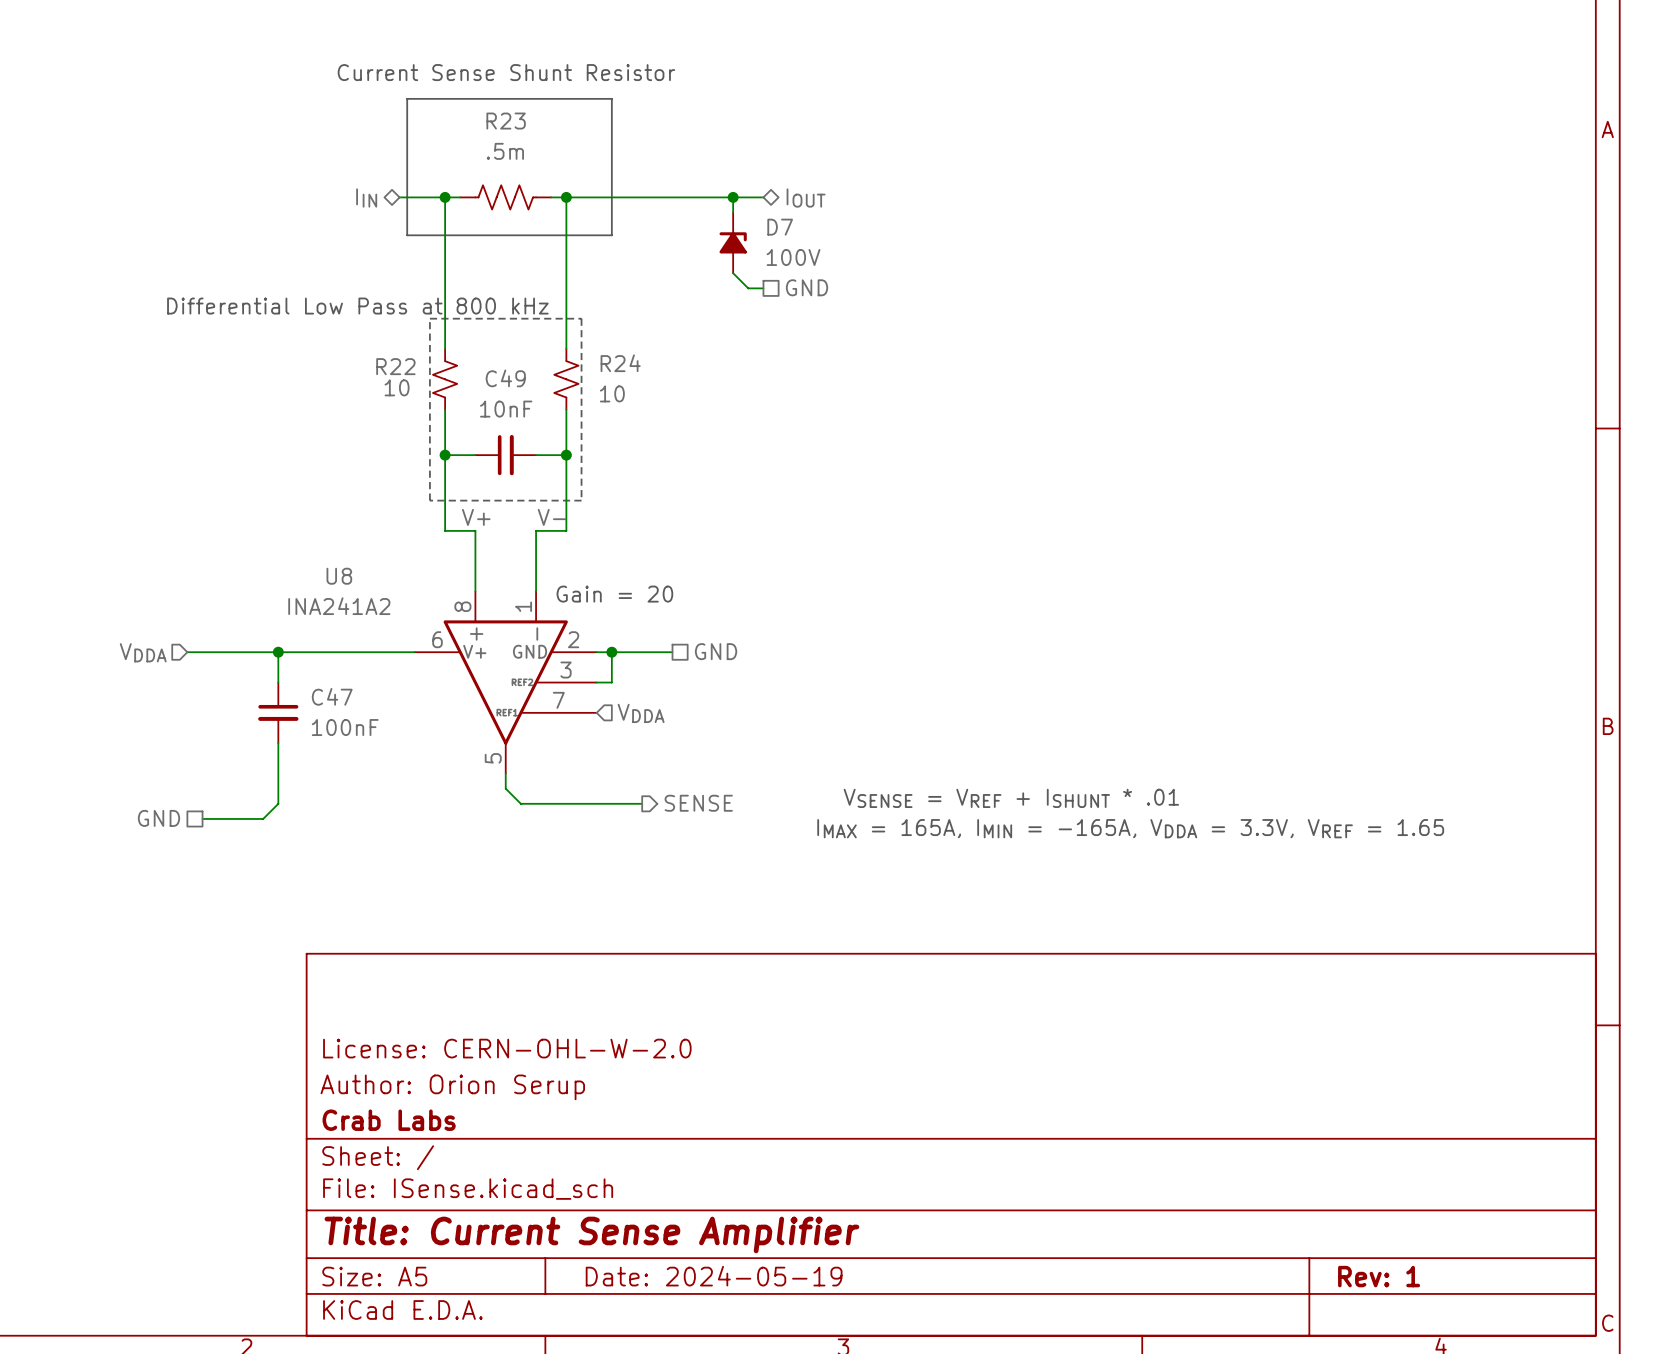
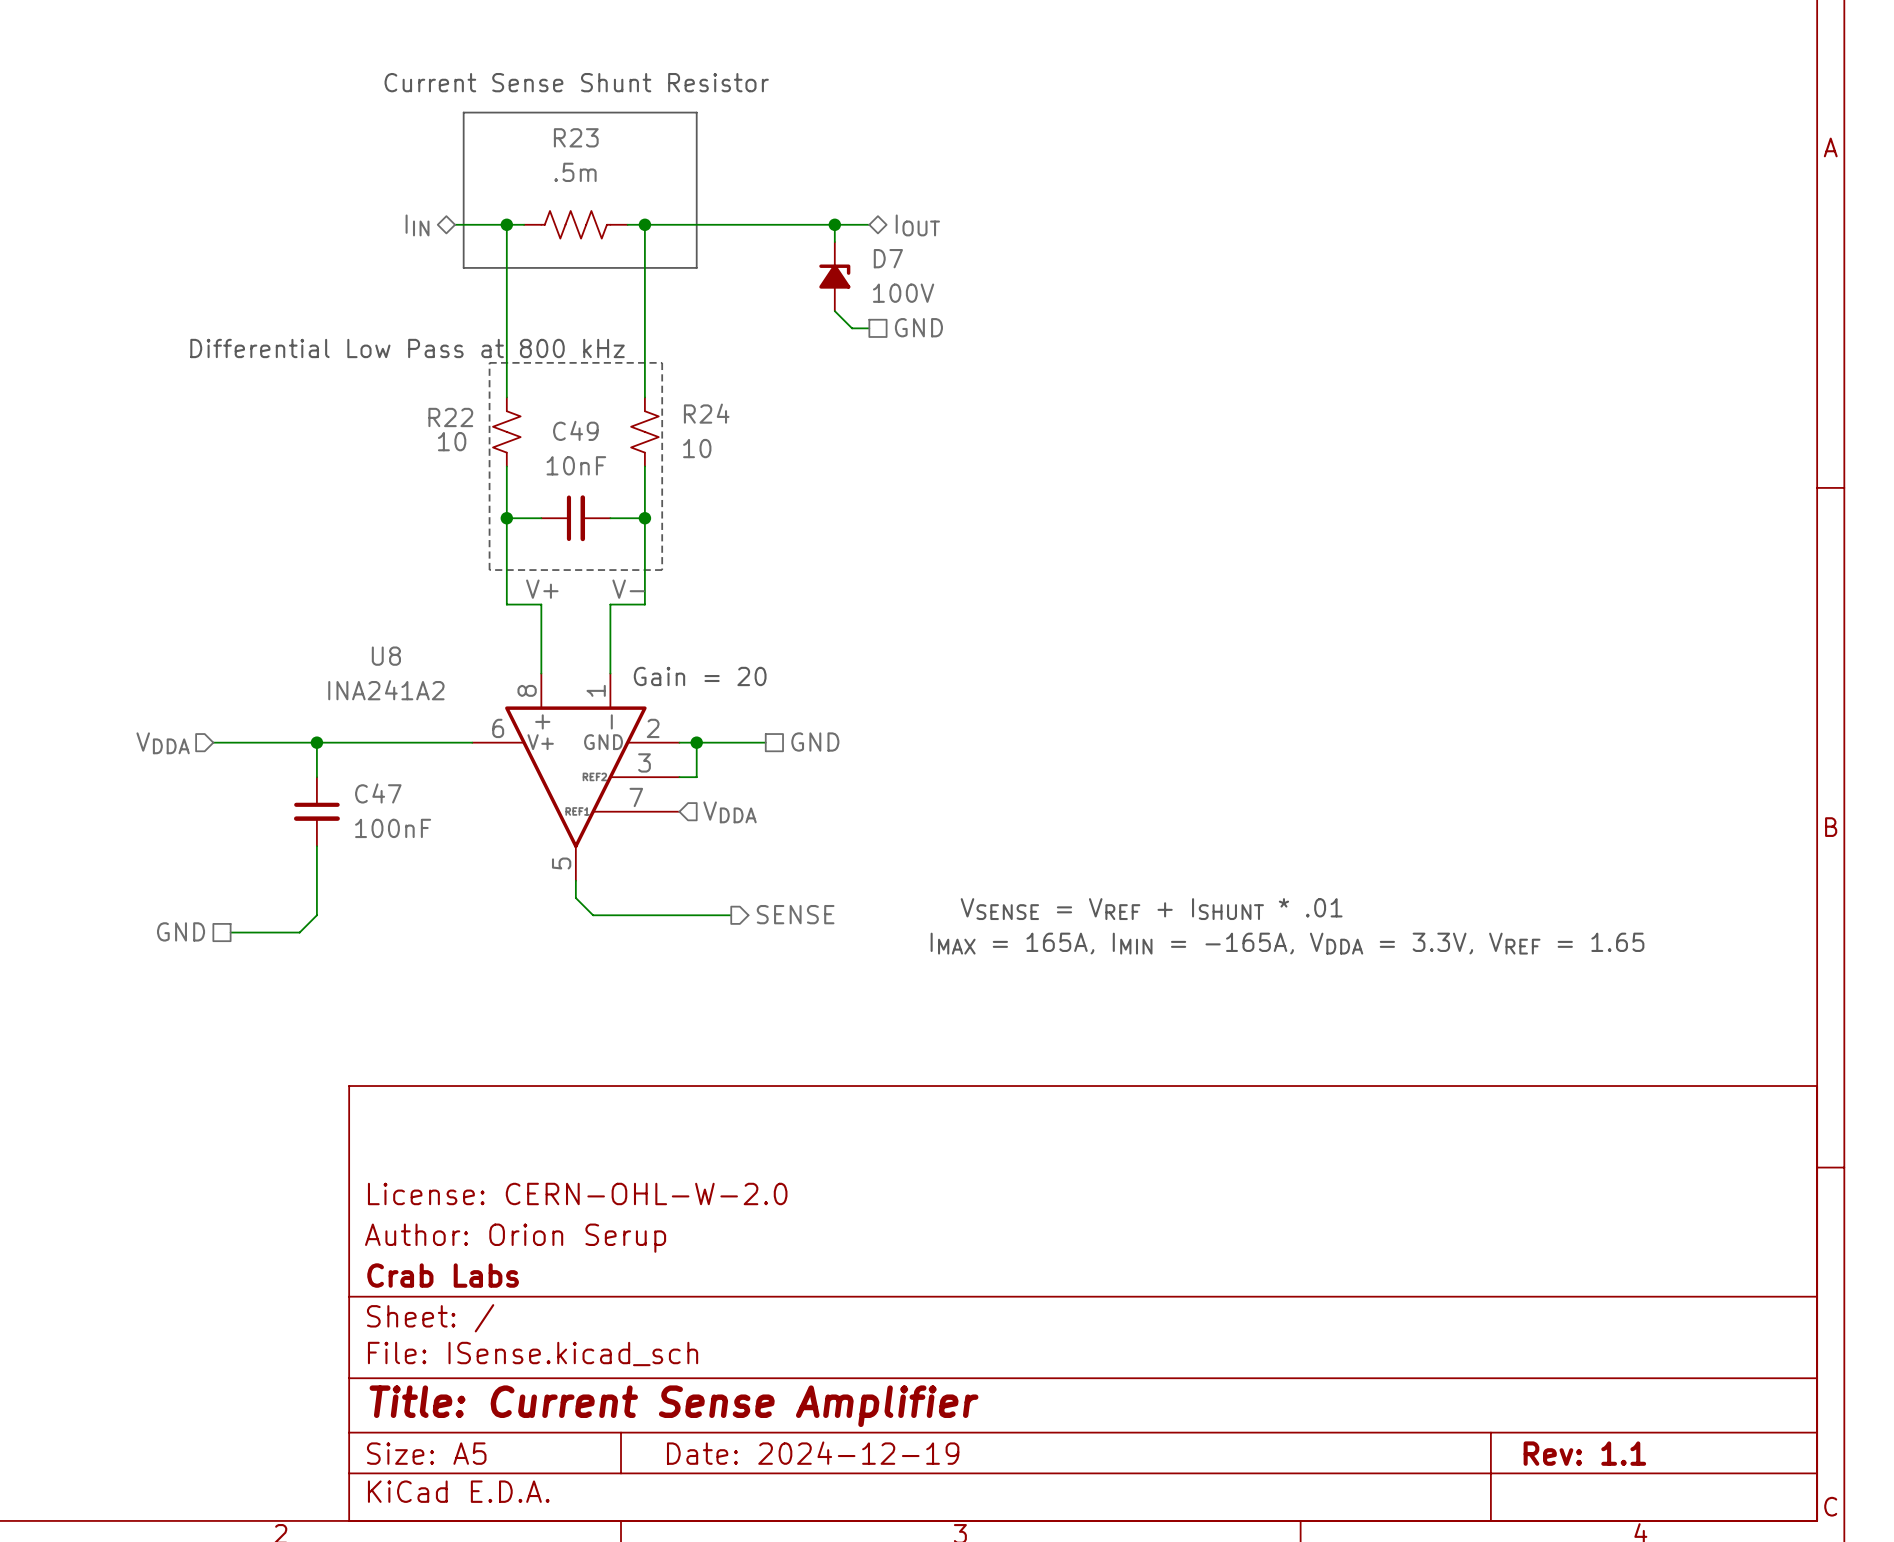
title block: Date: 2024-05-19 (714, 1276) -> Date: 2024-12-19 (813, 1453)
title block: Rev: 1 (1379, 1276) -> Rev: 1.1 (1584, 1453)

